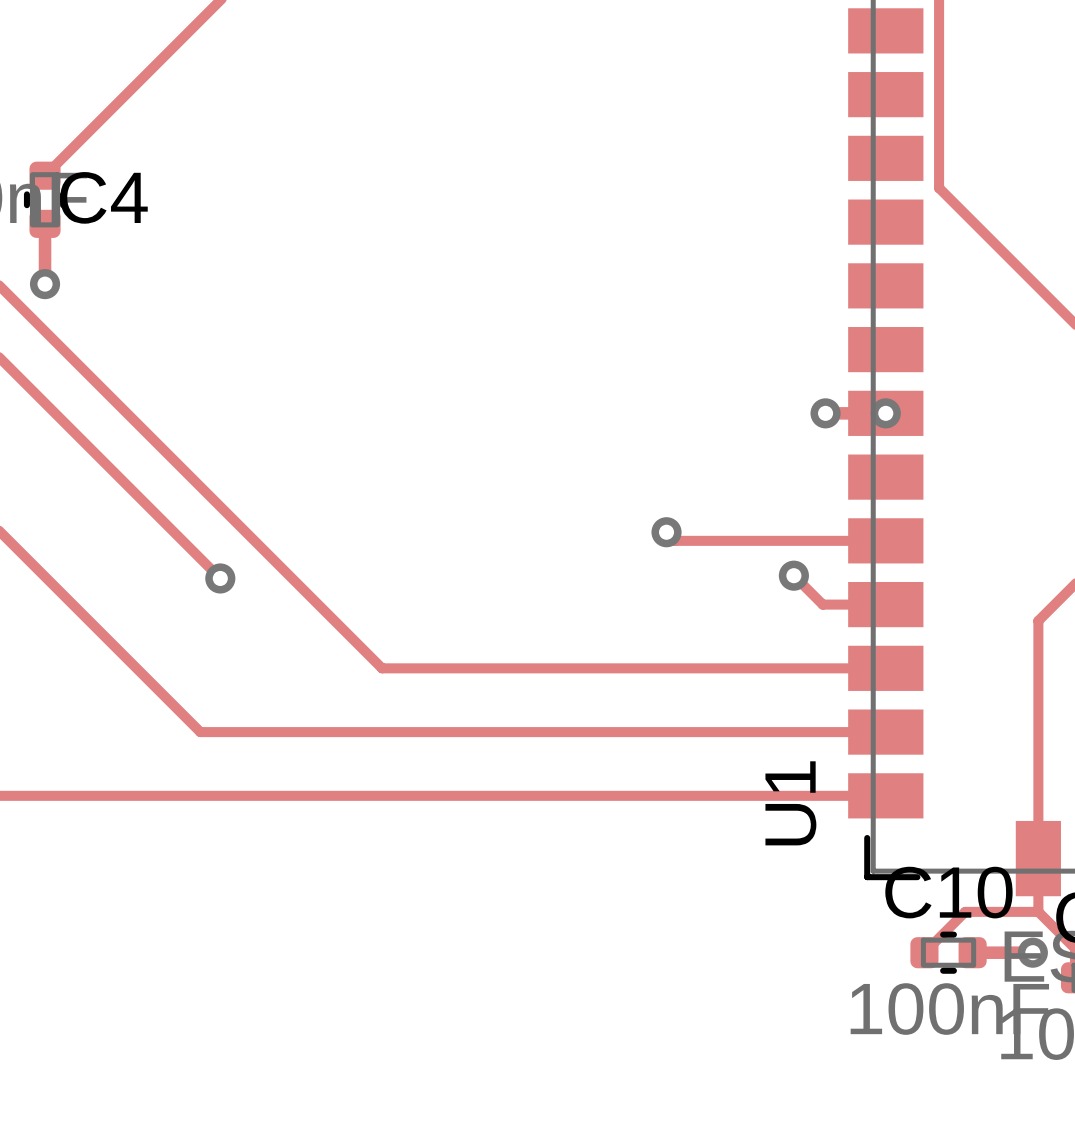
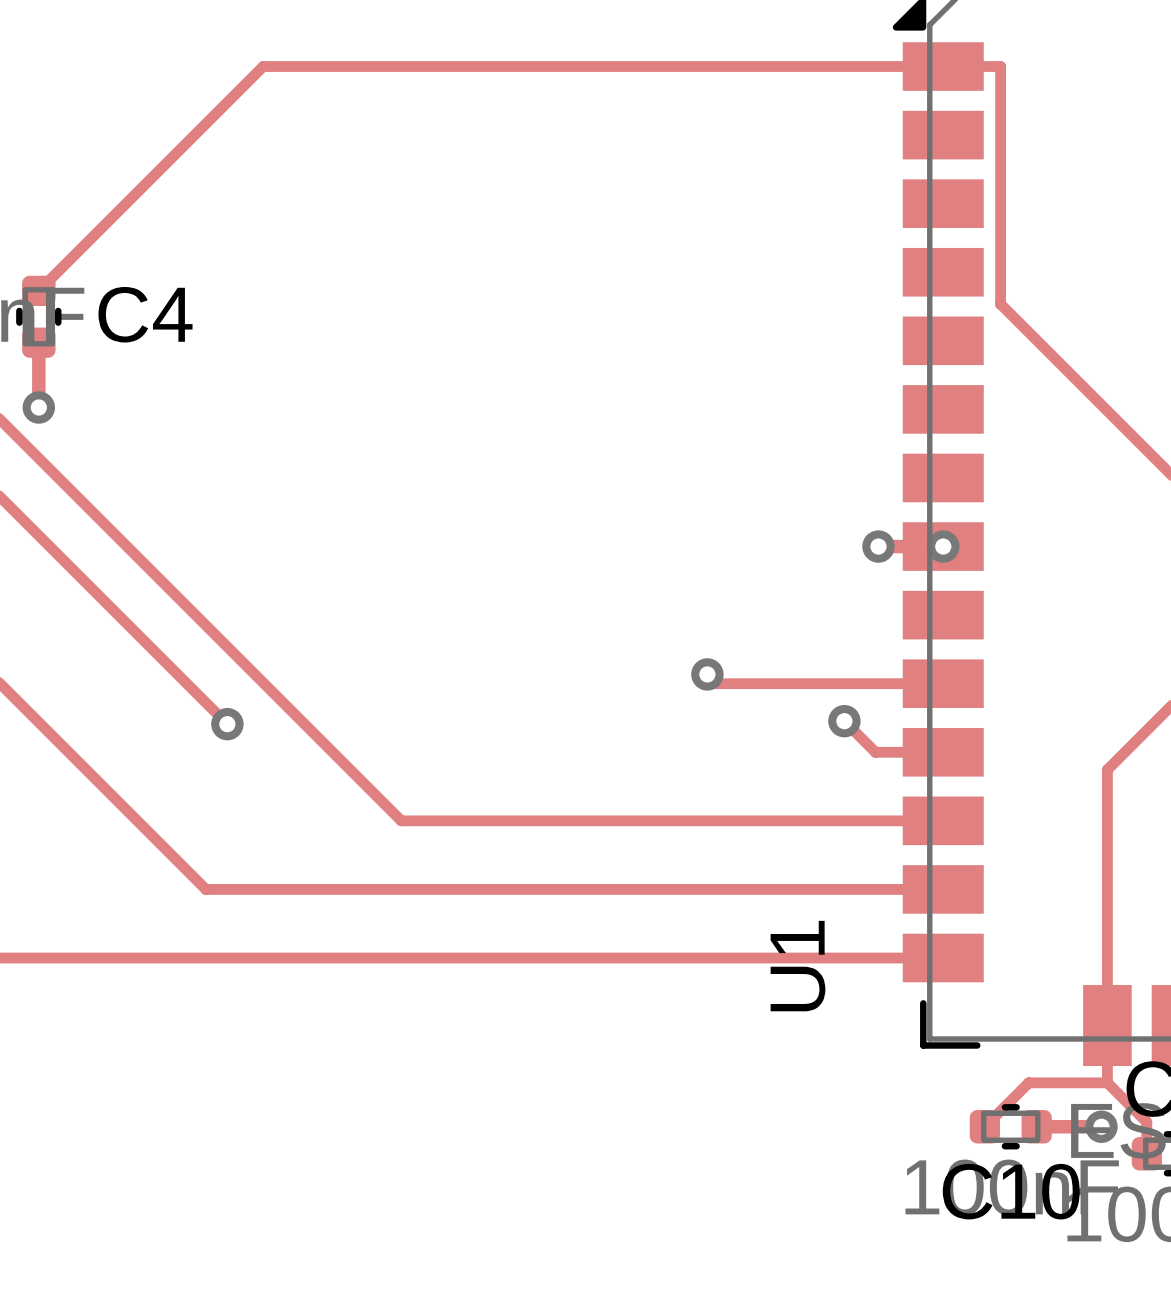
C4 name position: C4 (104, 197) -> C4 (145, 314)
U1 name position: U1 (790, 803) -> U1 (798, 966)
C10 name position: C10 (948, 892) -> C10 (1011, 1191)

